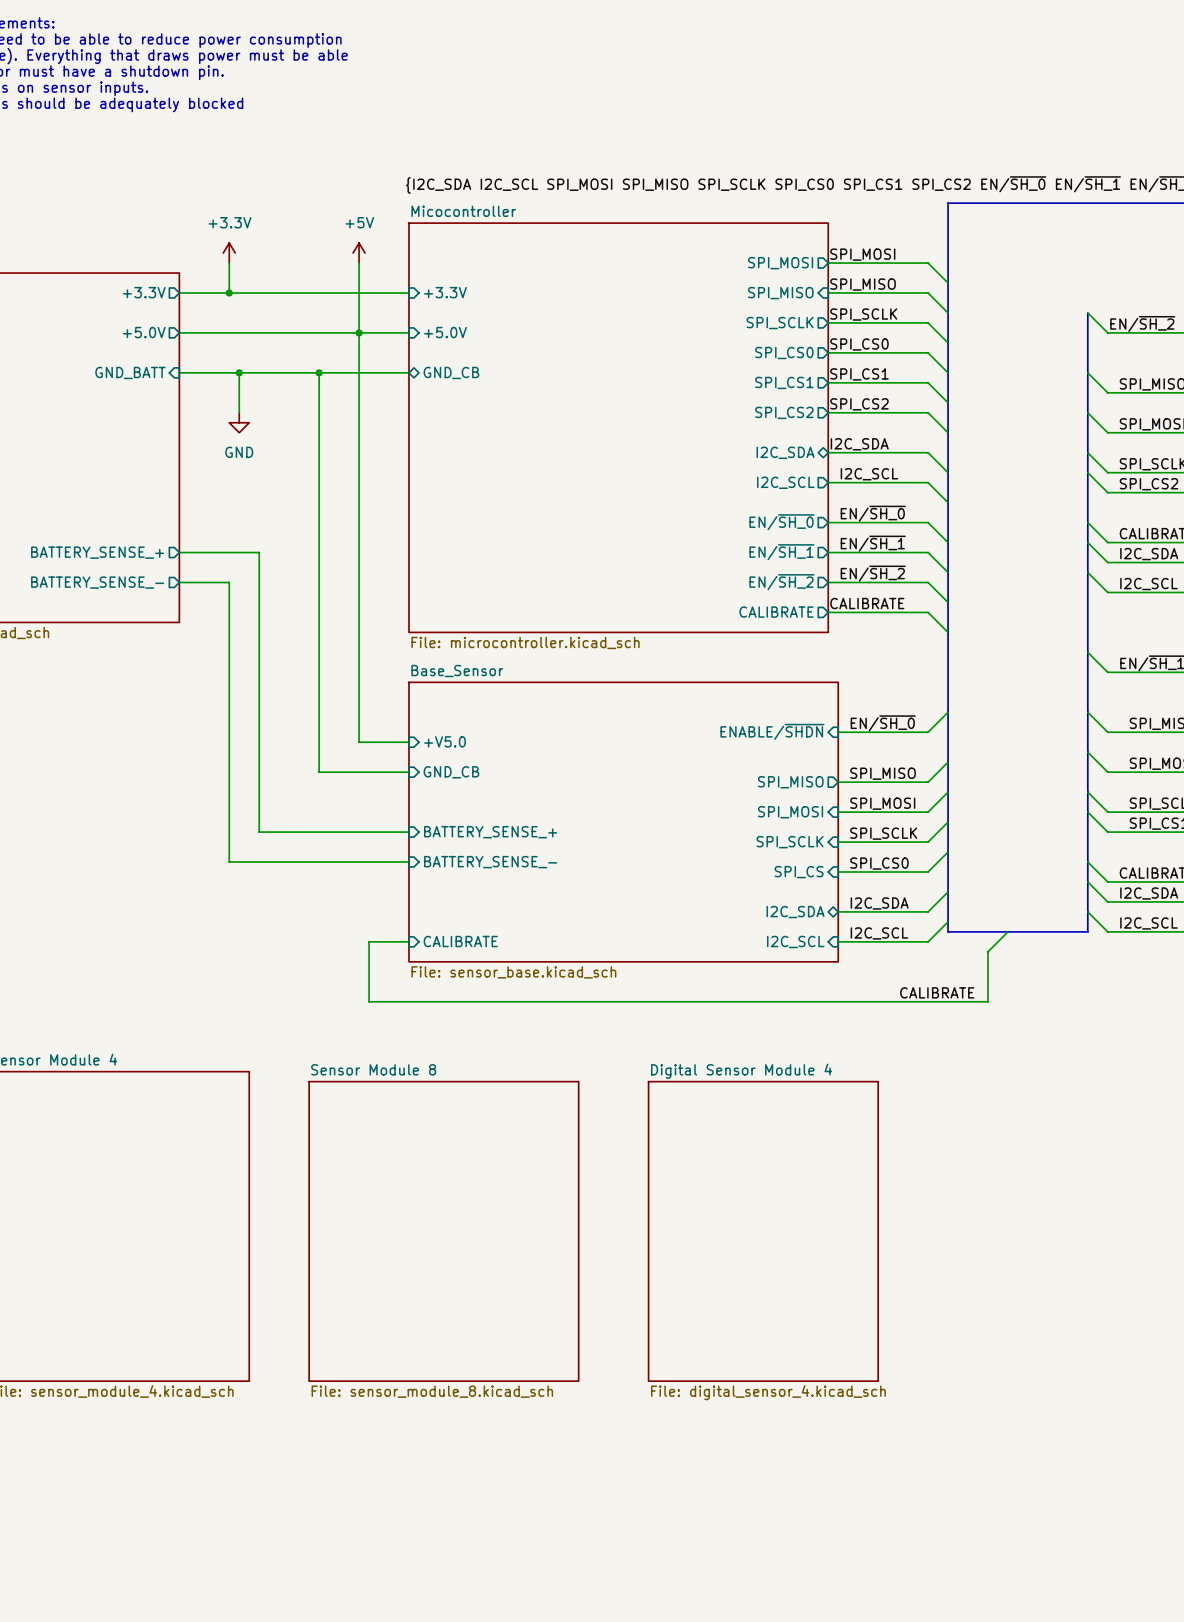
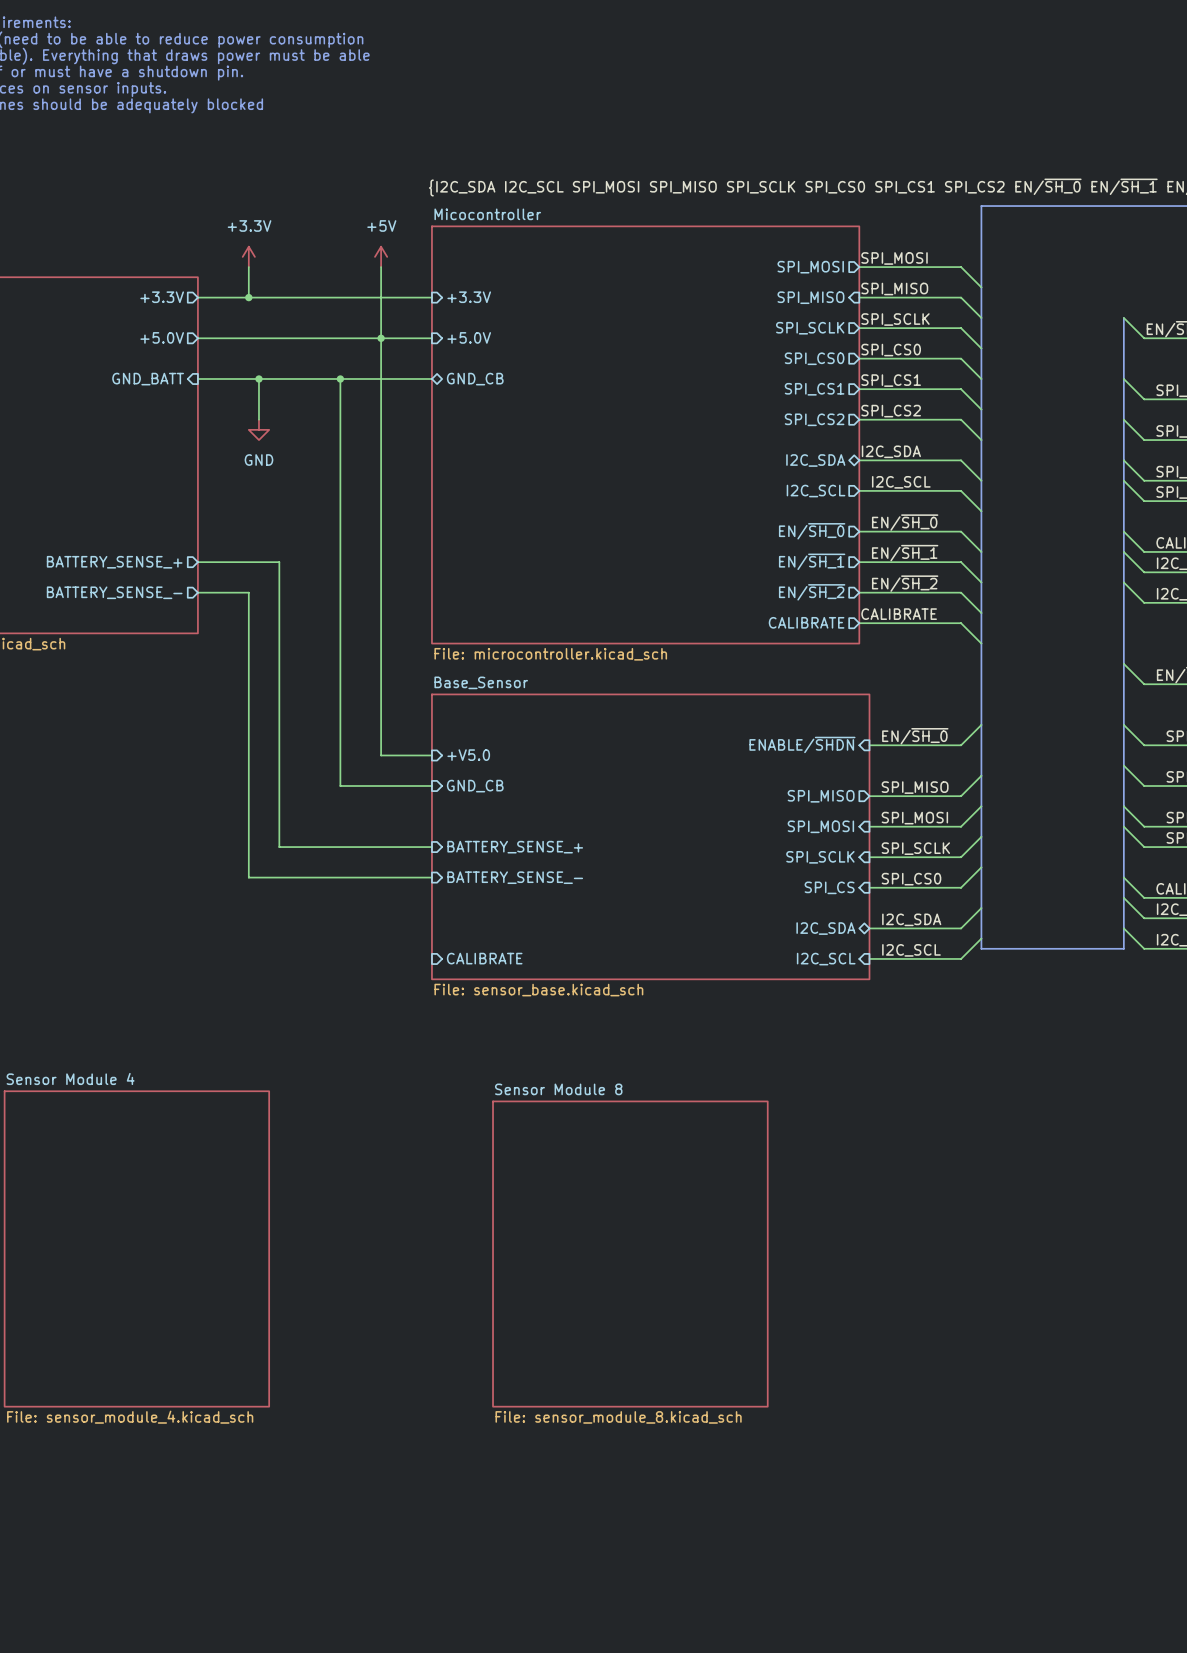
wire: (1007, 931) (987, 951) (987, 1001) (369, 1001) (369, 941) (408, 941) -> none
label: CALIBRATE (937, 992) -> none
sheet Sensor Module 8 position: (443, 1231) -> (630, 1254)
sheet Digital Sensor Module 4: File: digital_sensor_4.kicad_sch (763, 1231) -> none

